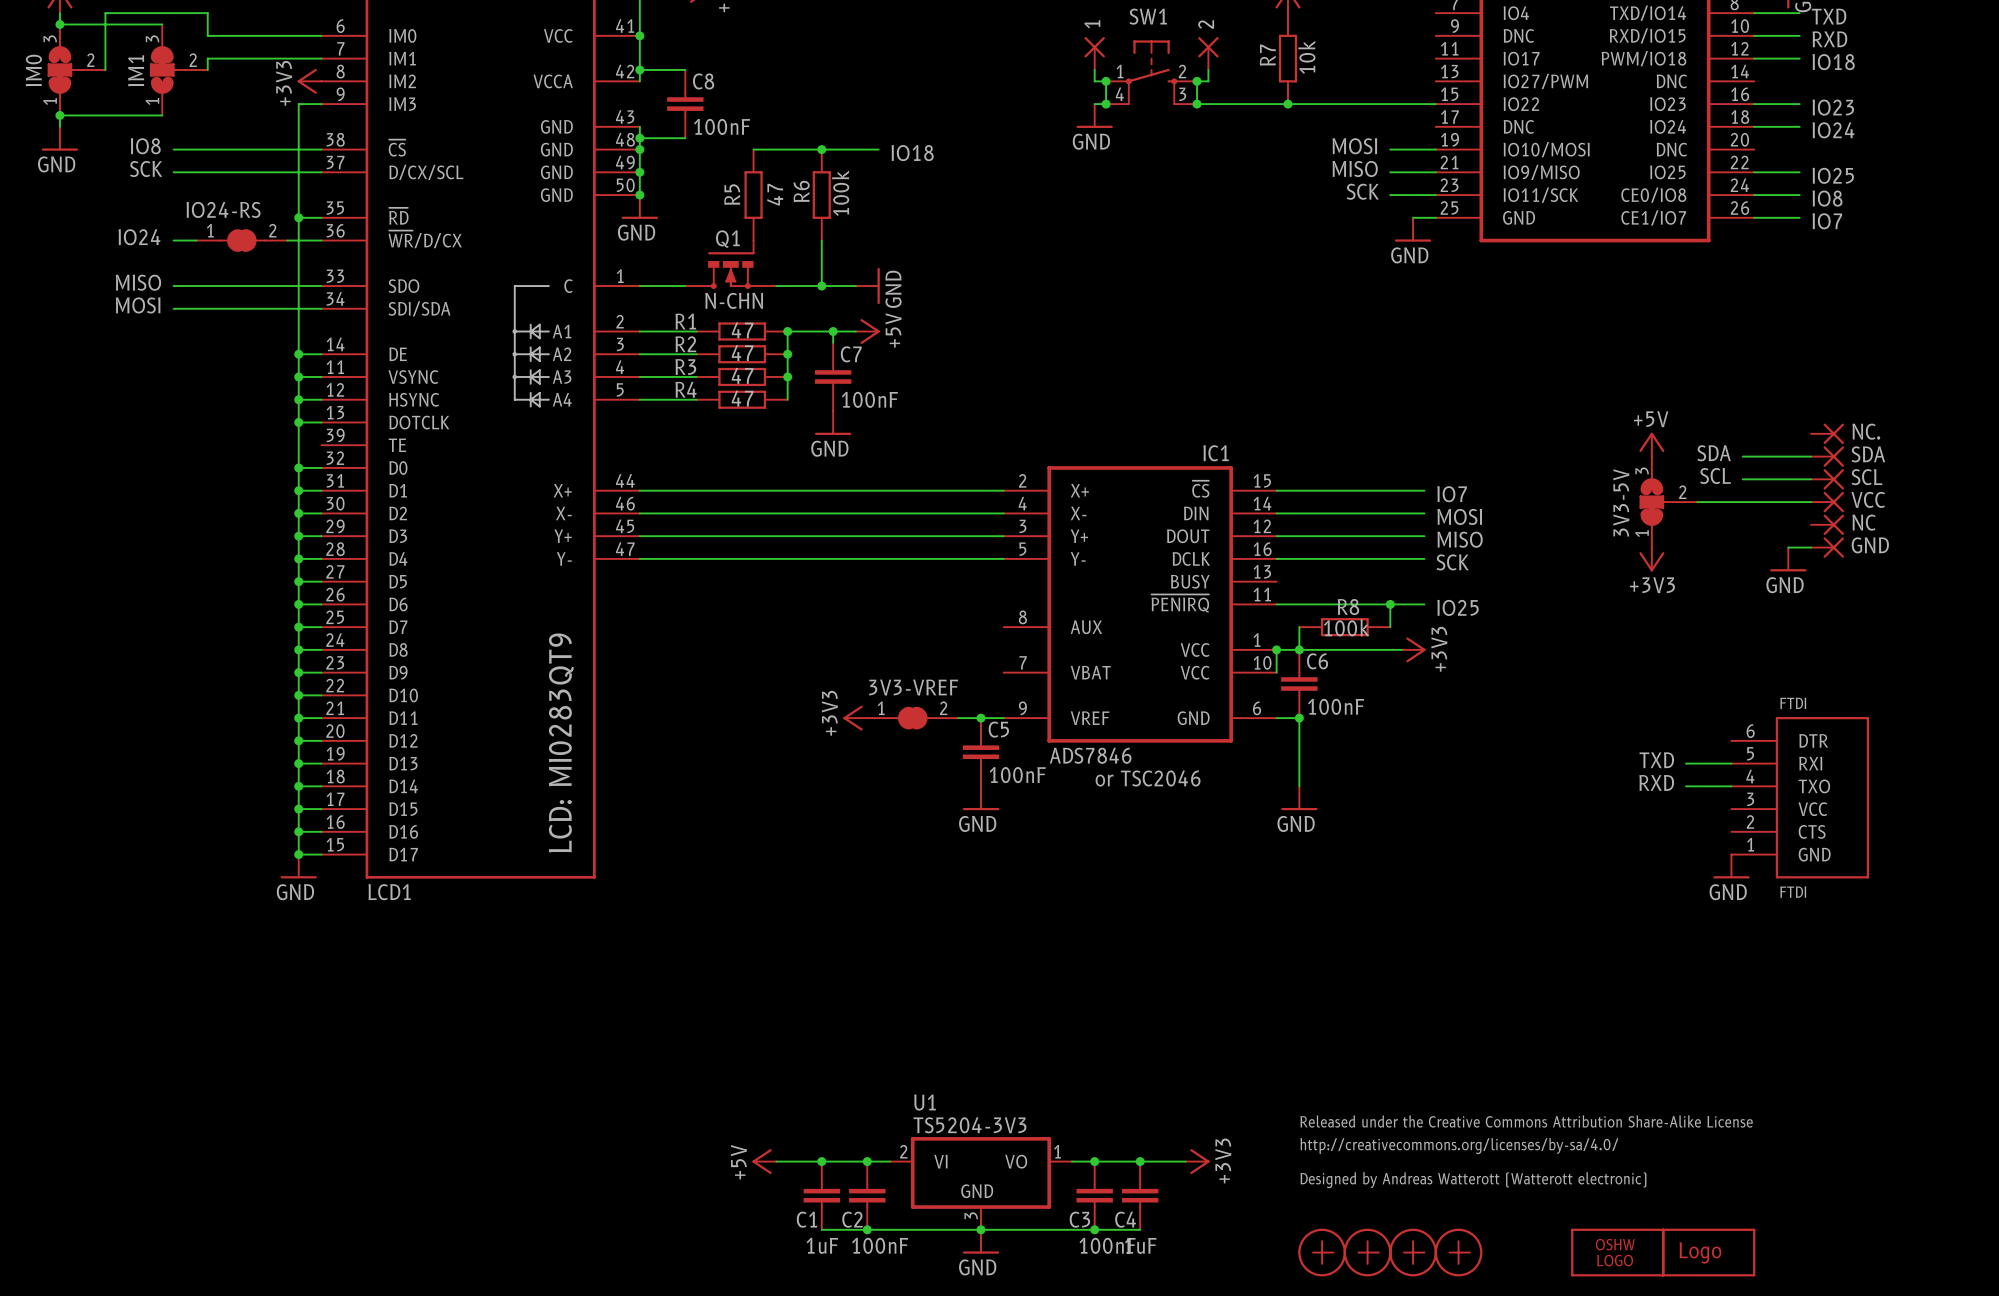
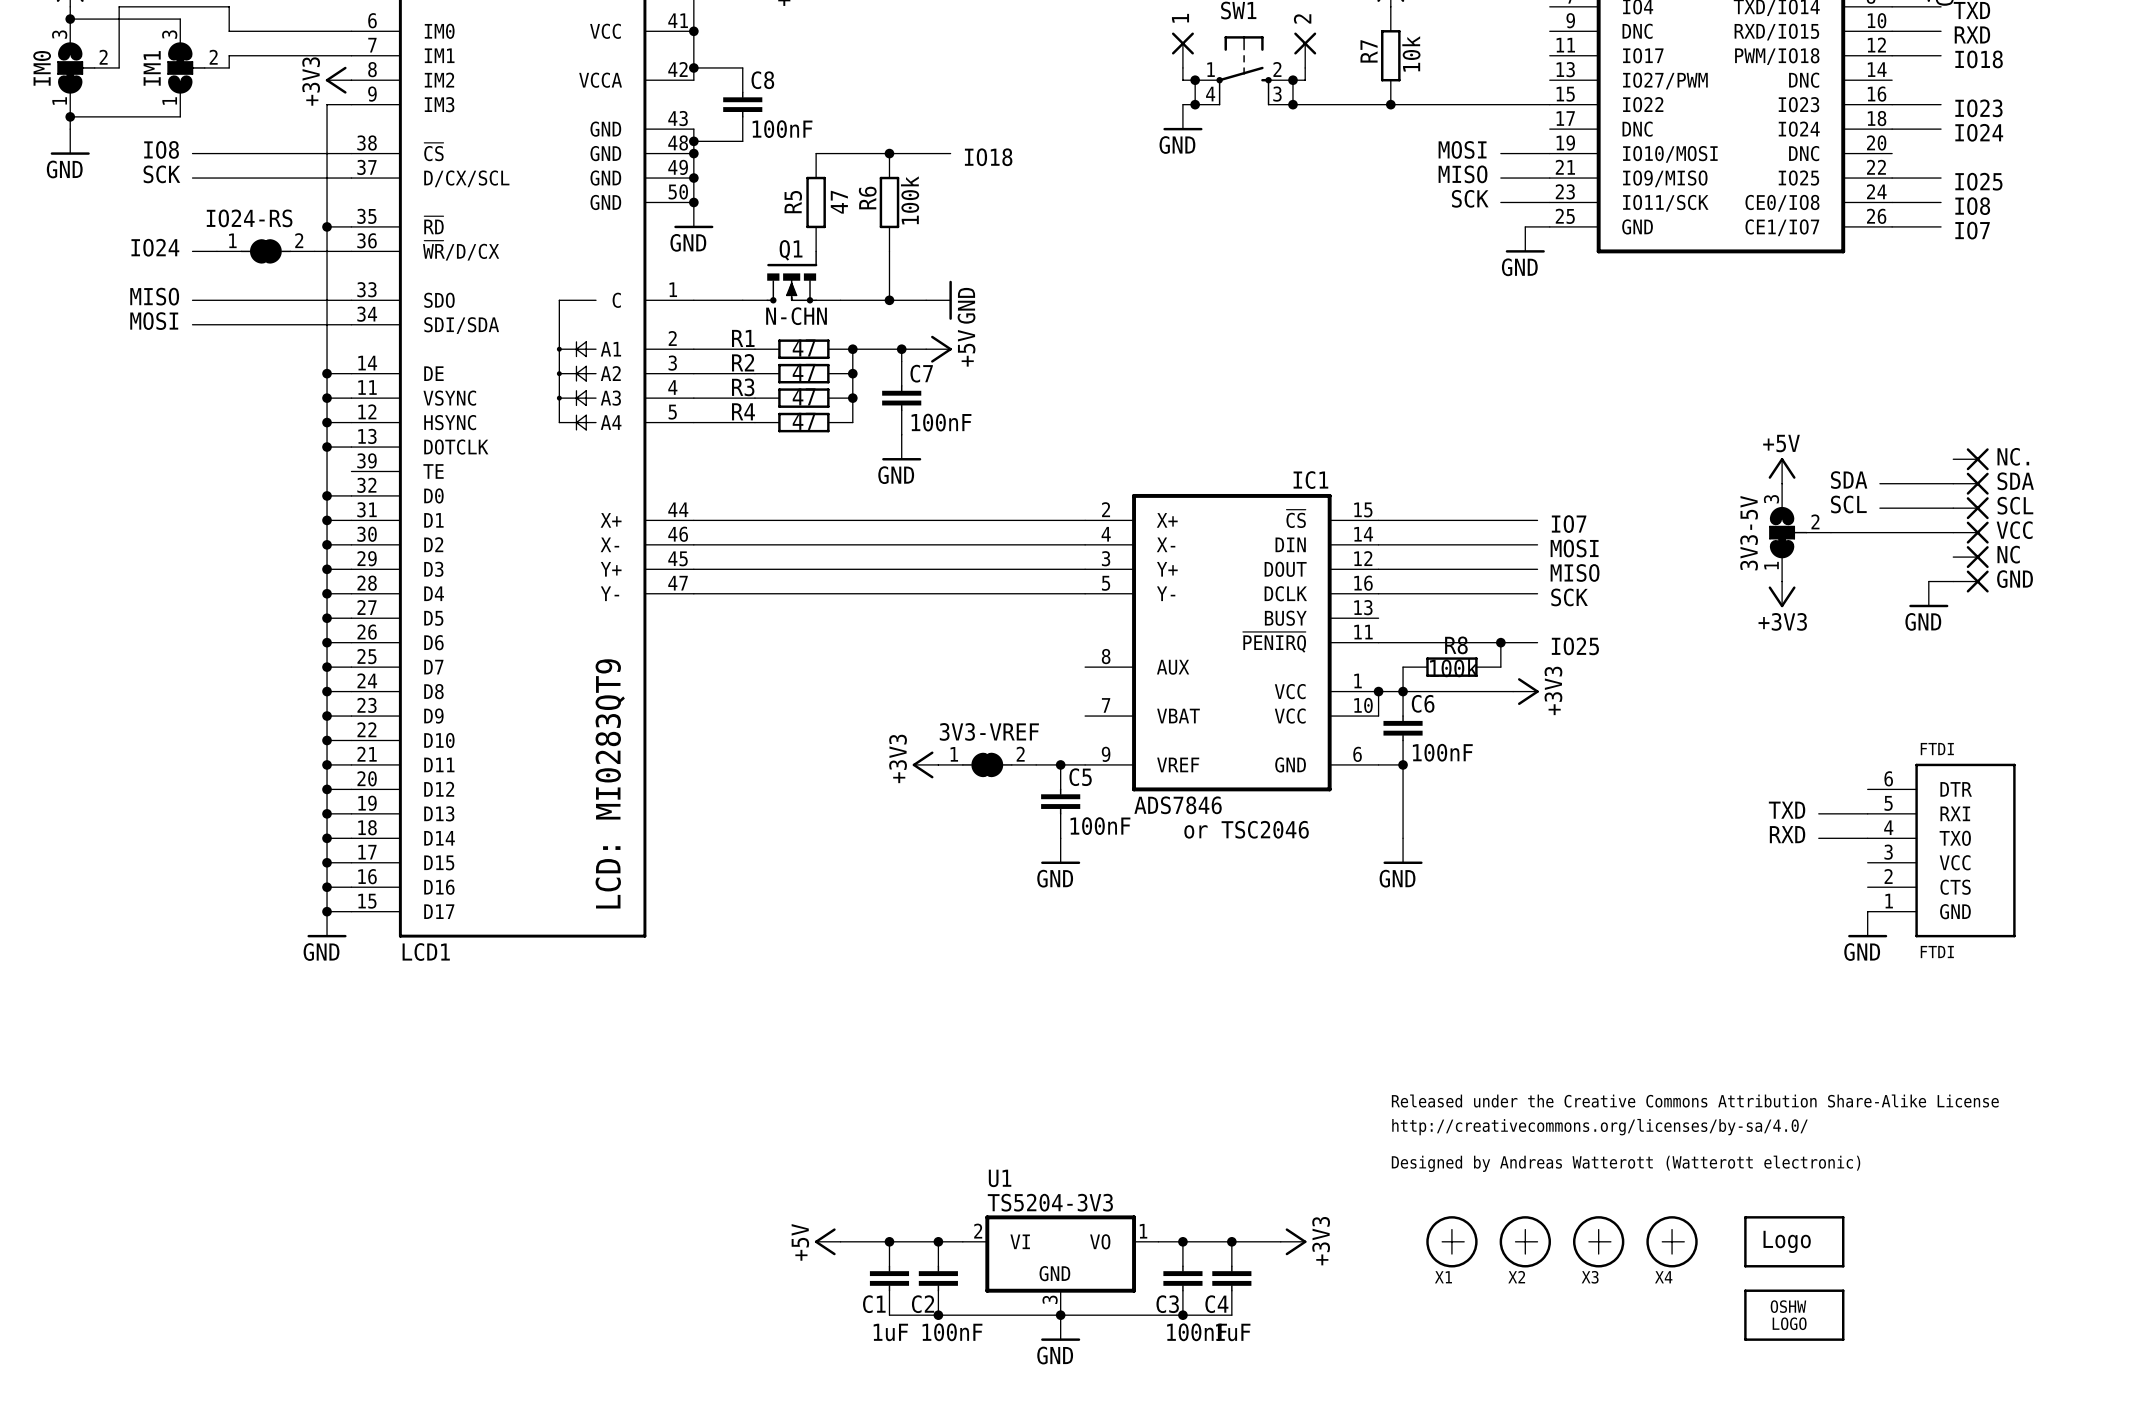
text position: Released under the Creative Commons Attribution Share-Alike License (1526, 1121) -> Released under the Creative Commons Attribution Share-Alike License (1695, 1101)
text position: http://creativecommons.org/licenses/by-sa/4.0/ (1459, 1146) -> http://creativecommons.org/licenses/by-sa/4.0/ (1599, 1127)
X1: none -> (1451, 1241)
X2: none -> (1525, 1241)
X3: none -> (1598, 1241)
X4: none -> (1672, 1241)
text position: Designed by Andreas Watterott (Watterott electronic) (1473, 1180) -> Designed by Andreas Watterott (Watterott electronic) (1626, 1163)
part: (1322, 1252) -> none
part: (1367, 1252) -> none
part: (1413, 1252) -> none
part: (1458, 1252) -> none
part position: (1617, 1252) -> (1794, 1315)
part position: (1708, 1252) -> (1794, 1241)

